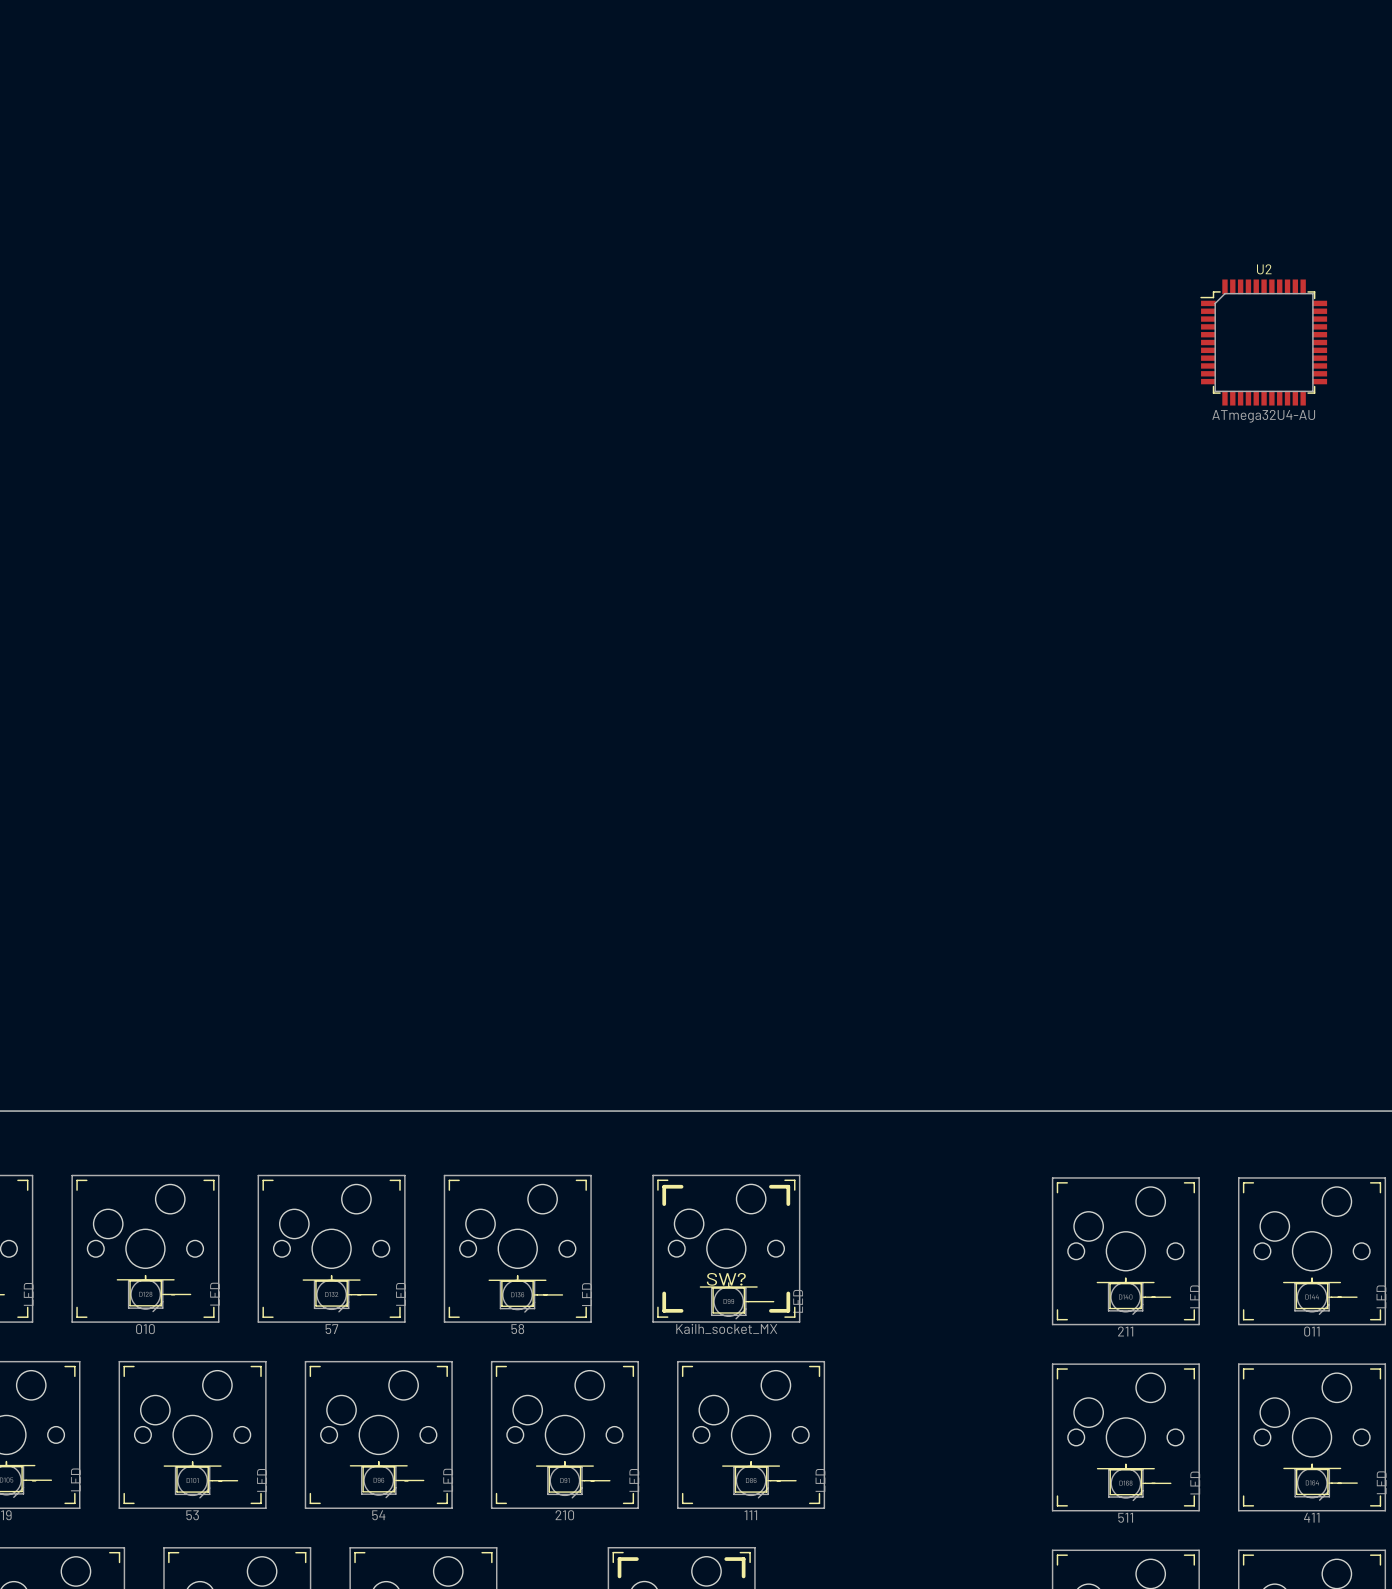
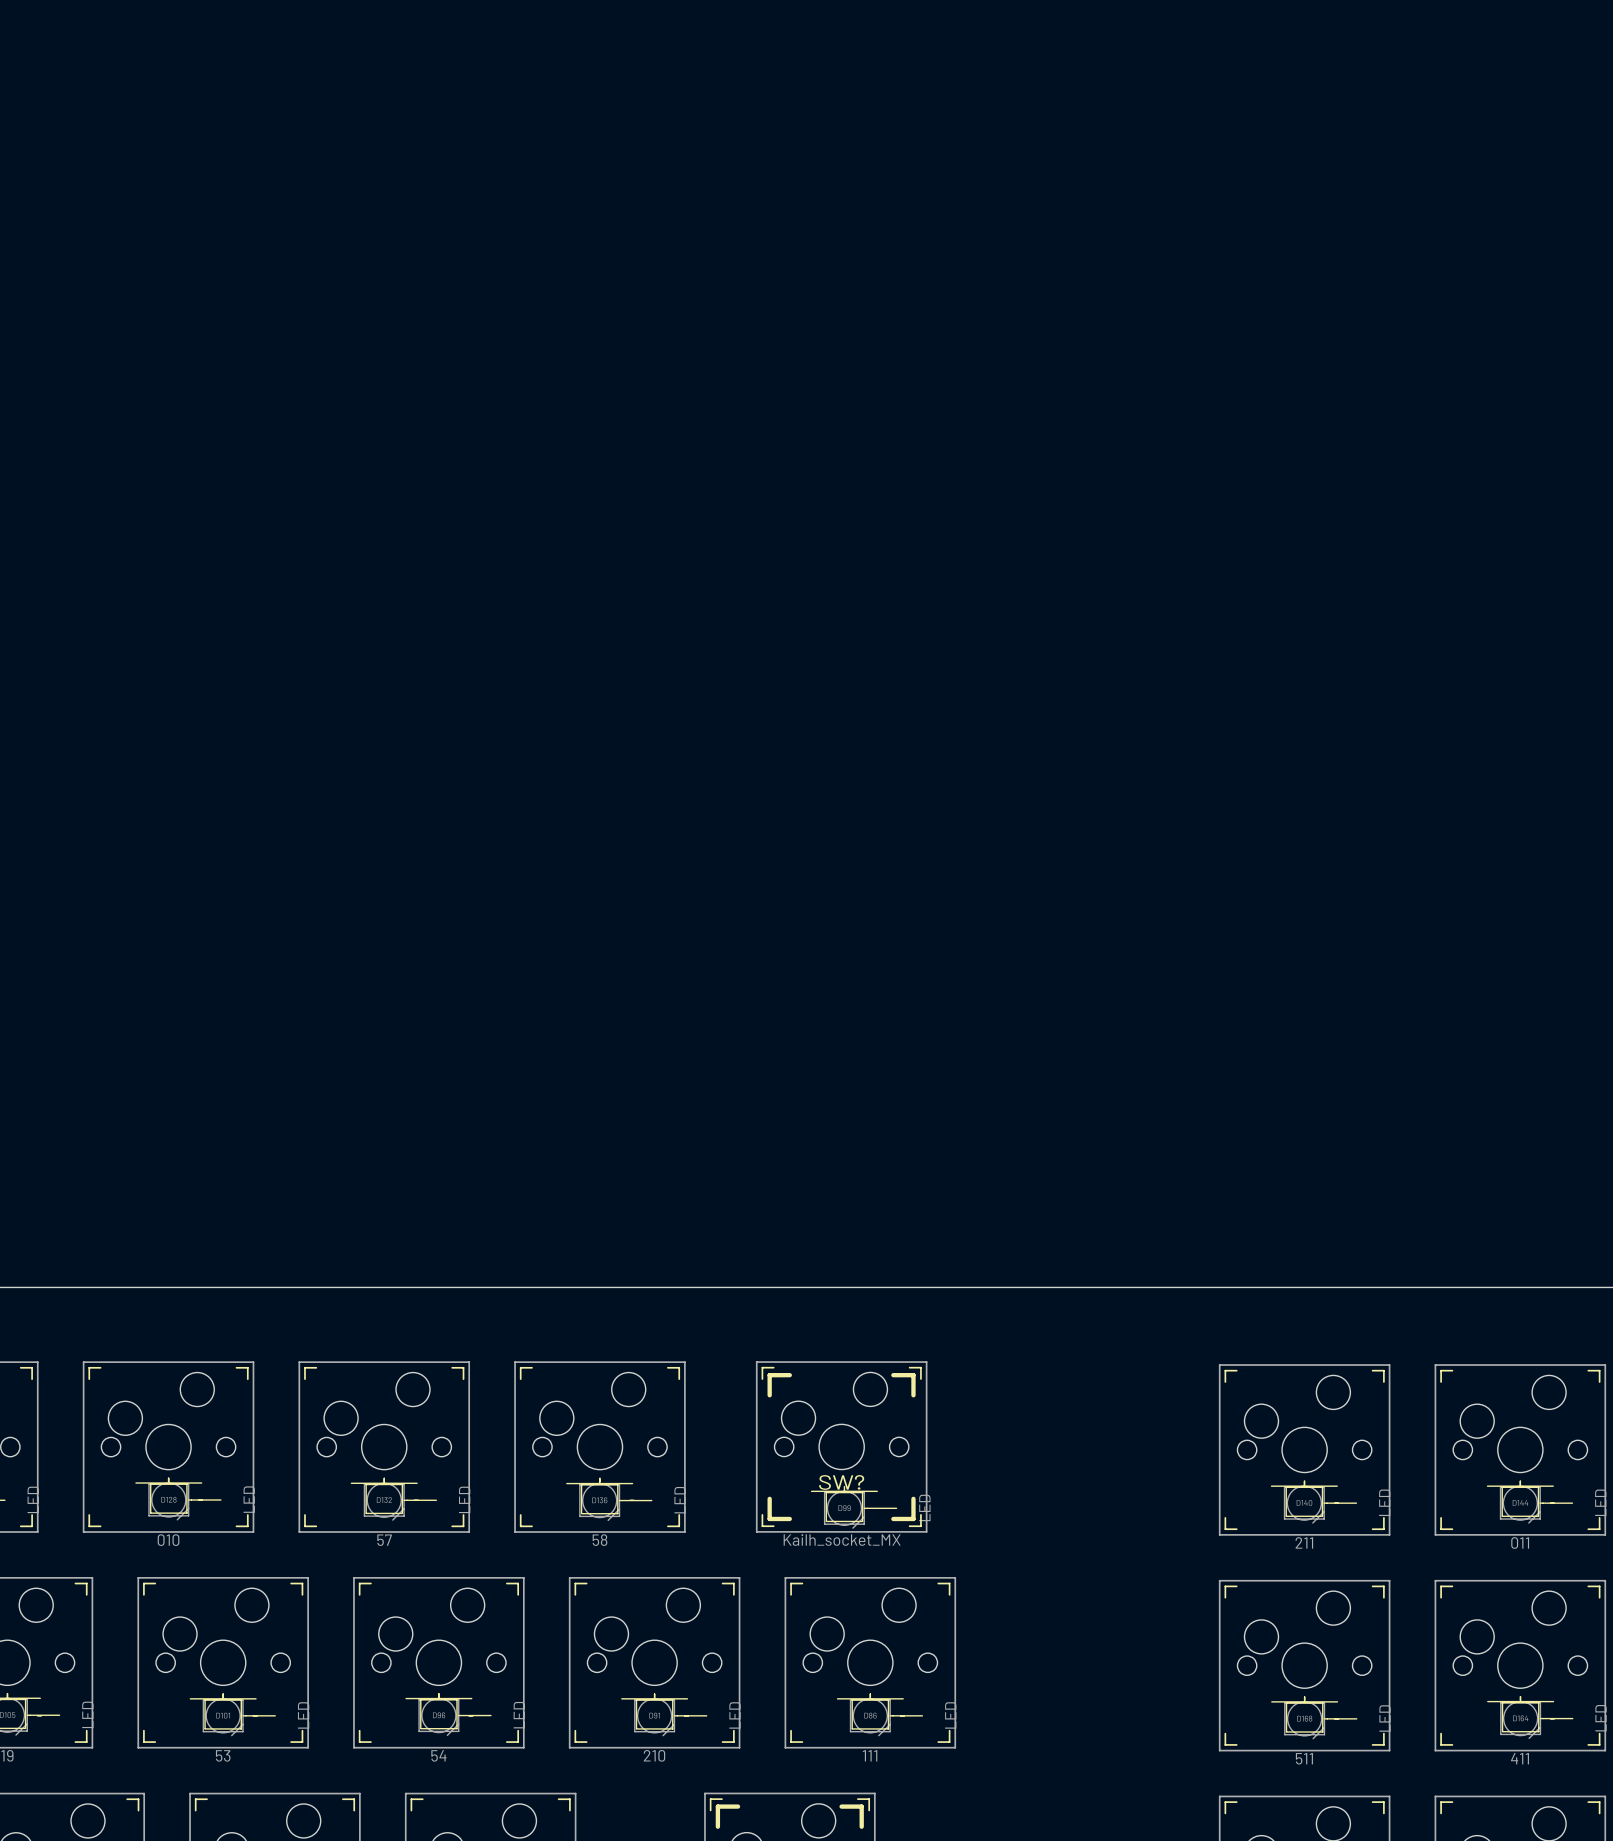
U2: ATmega32U4-AU (1263, 342) -> none

